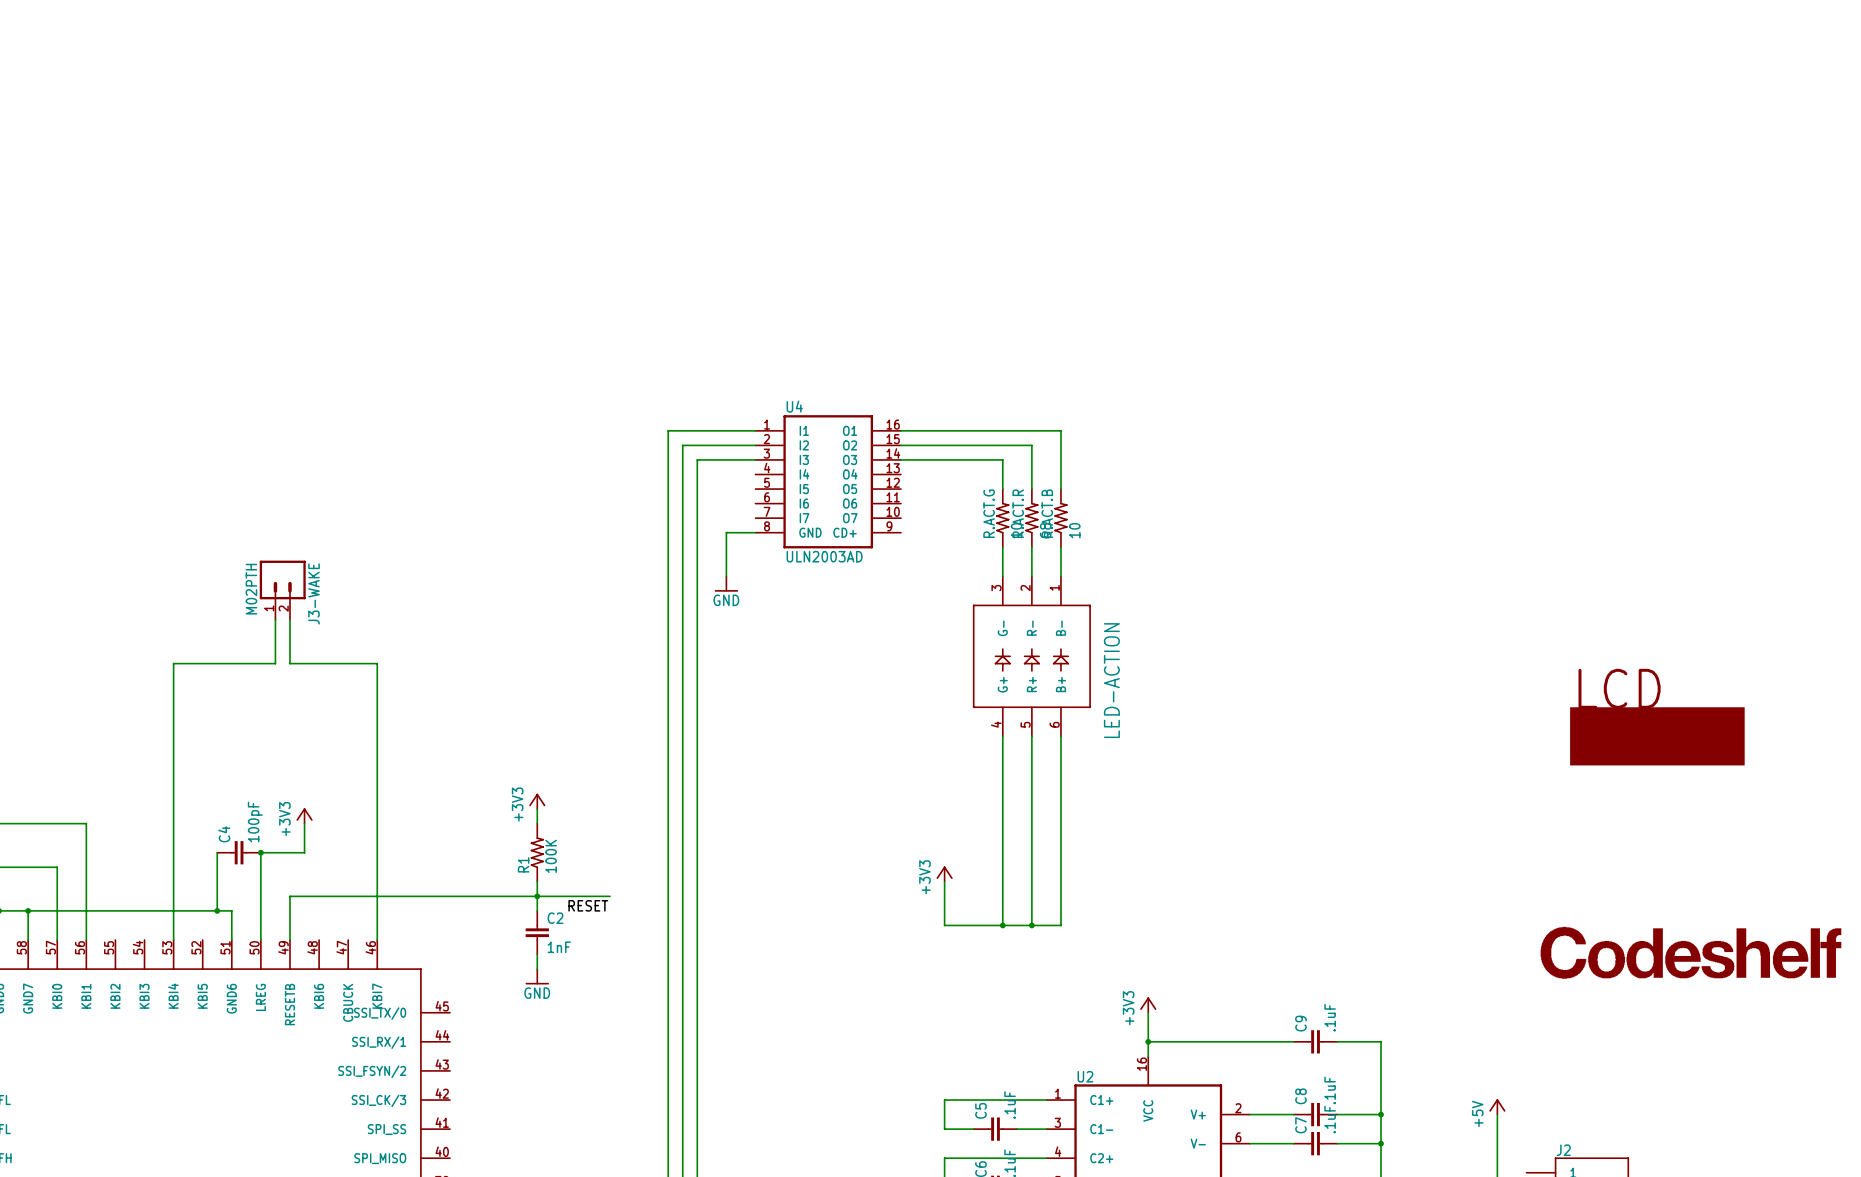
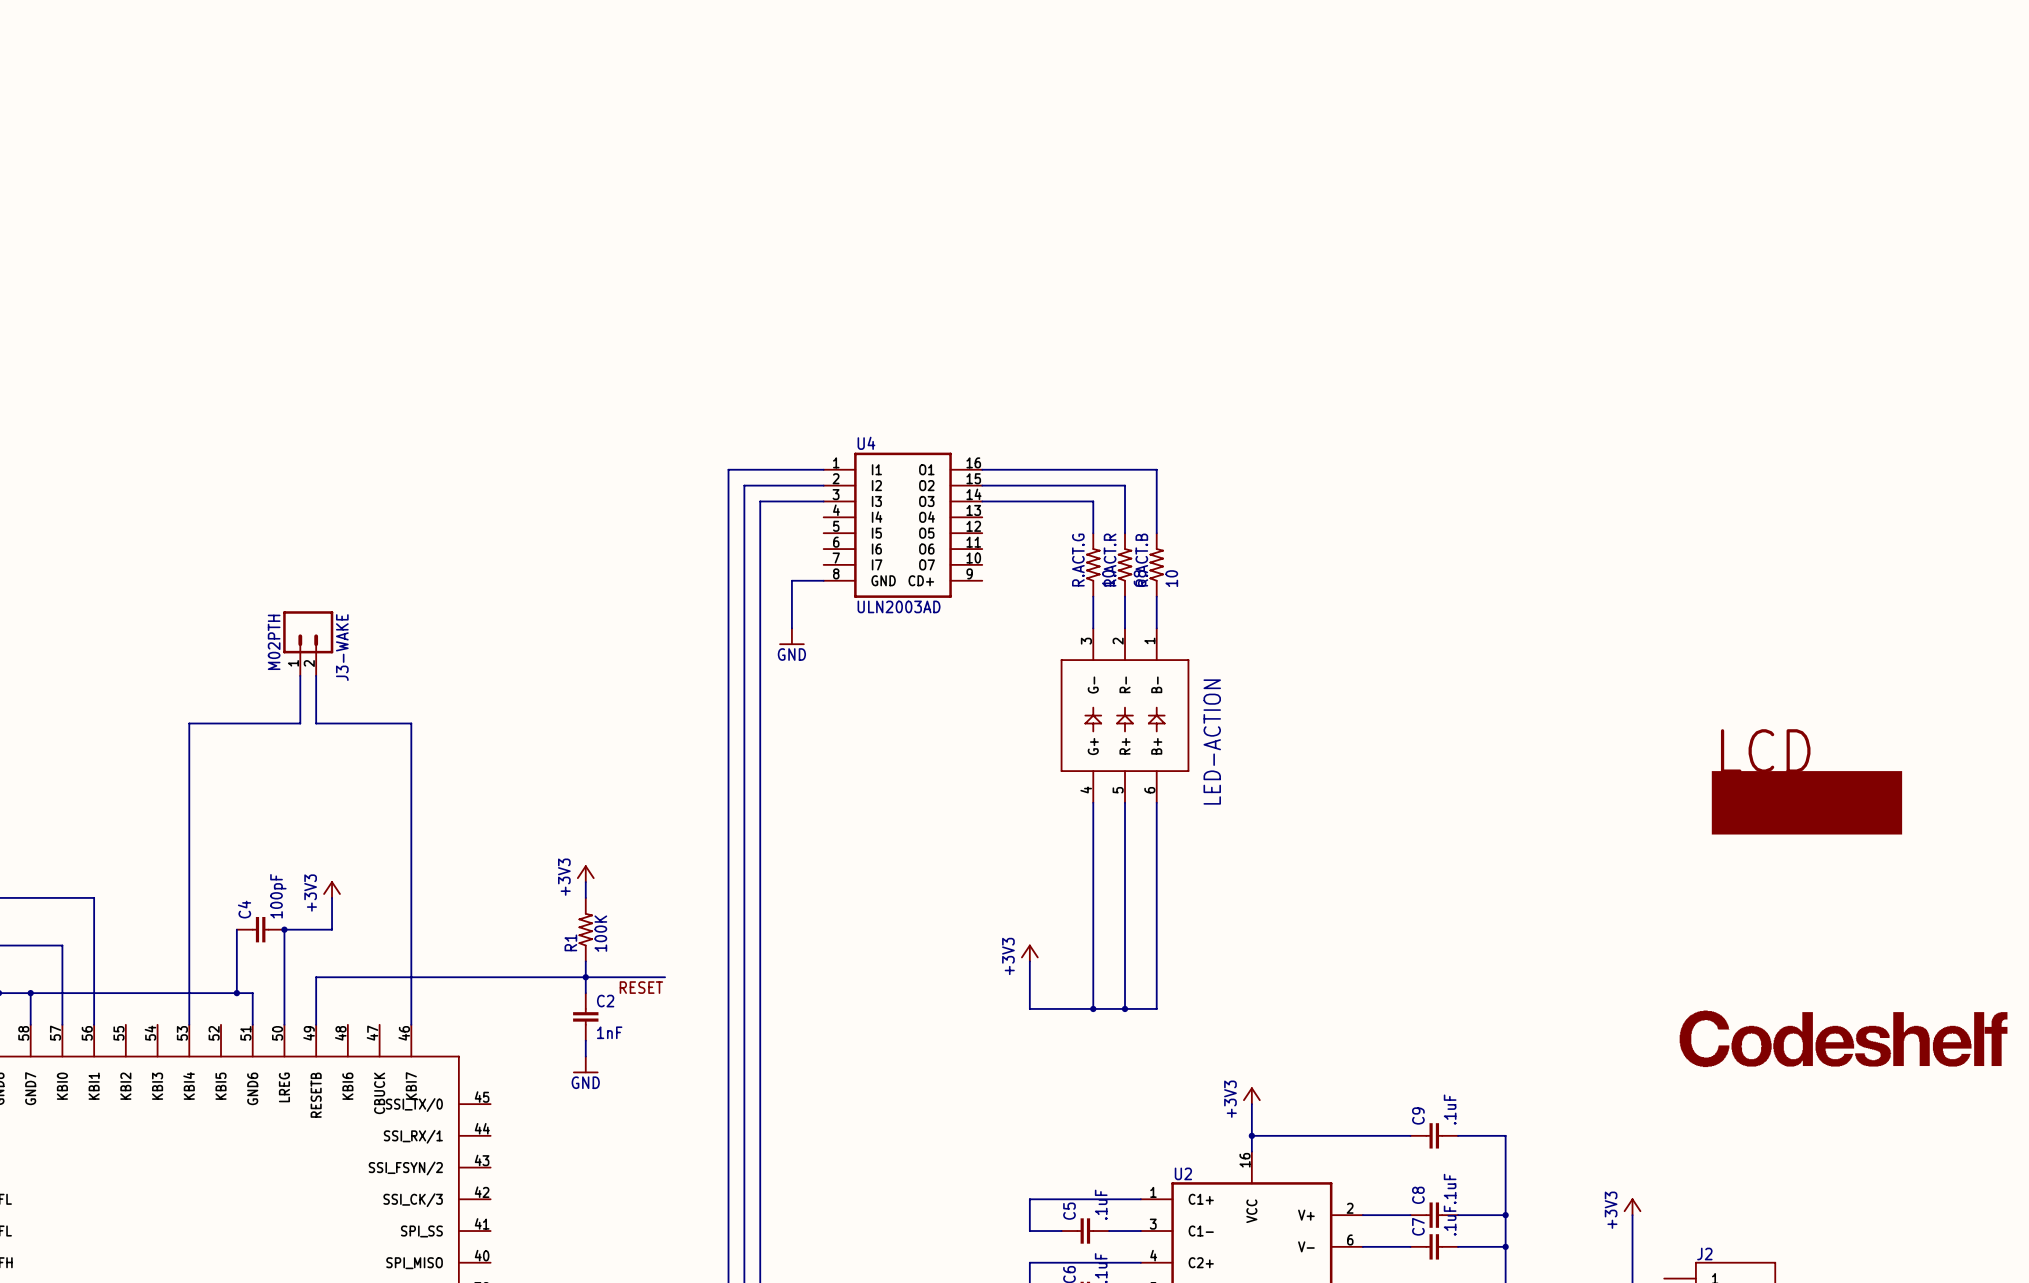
power symbol: +5V (1497, 1106) -> +3V3 (1632, 1206)

